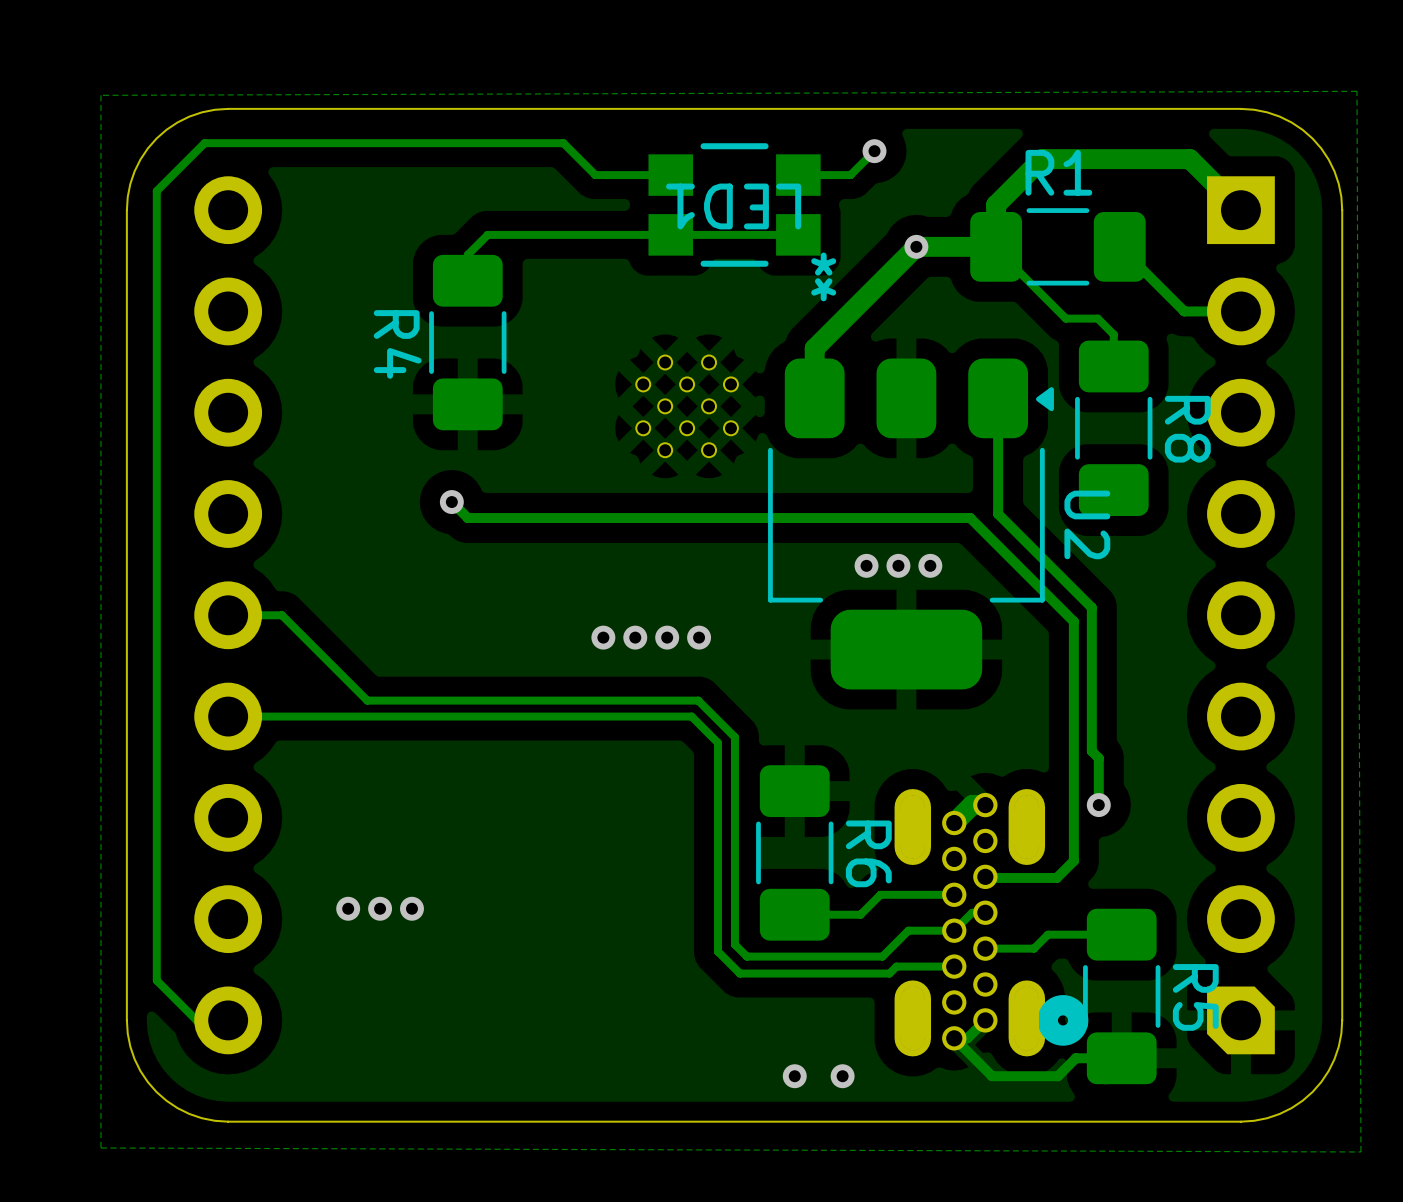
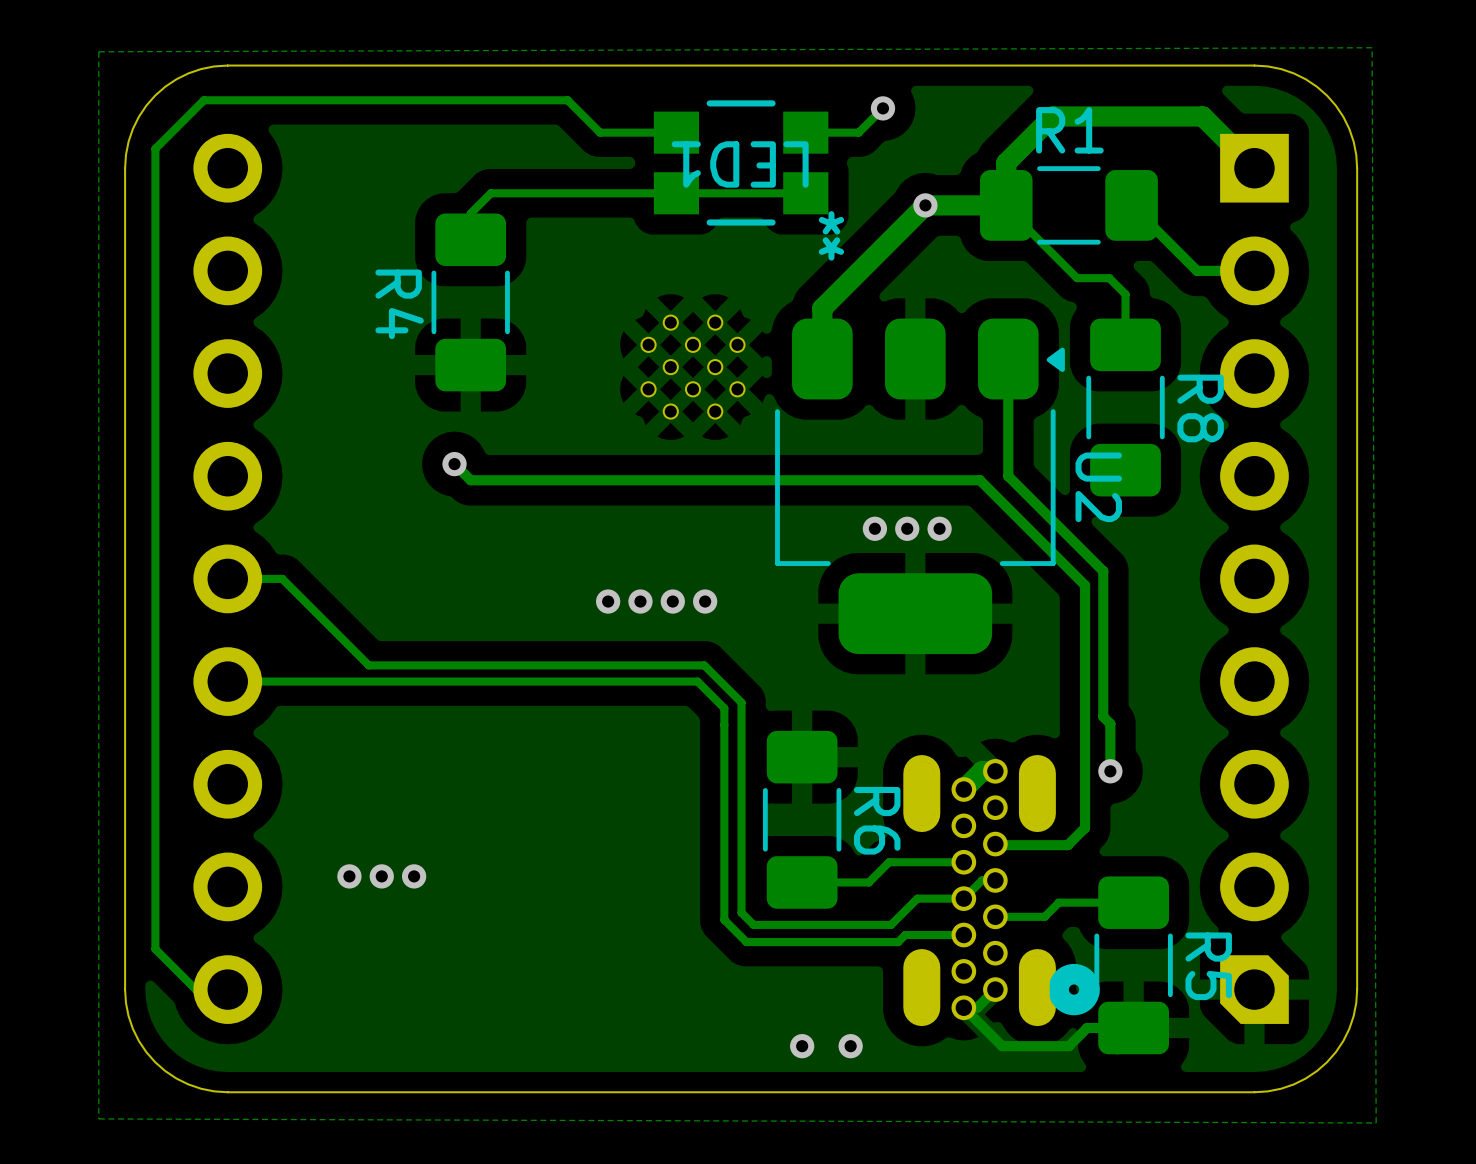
R8 position: (1113, 428) -> (1125, 407)

